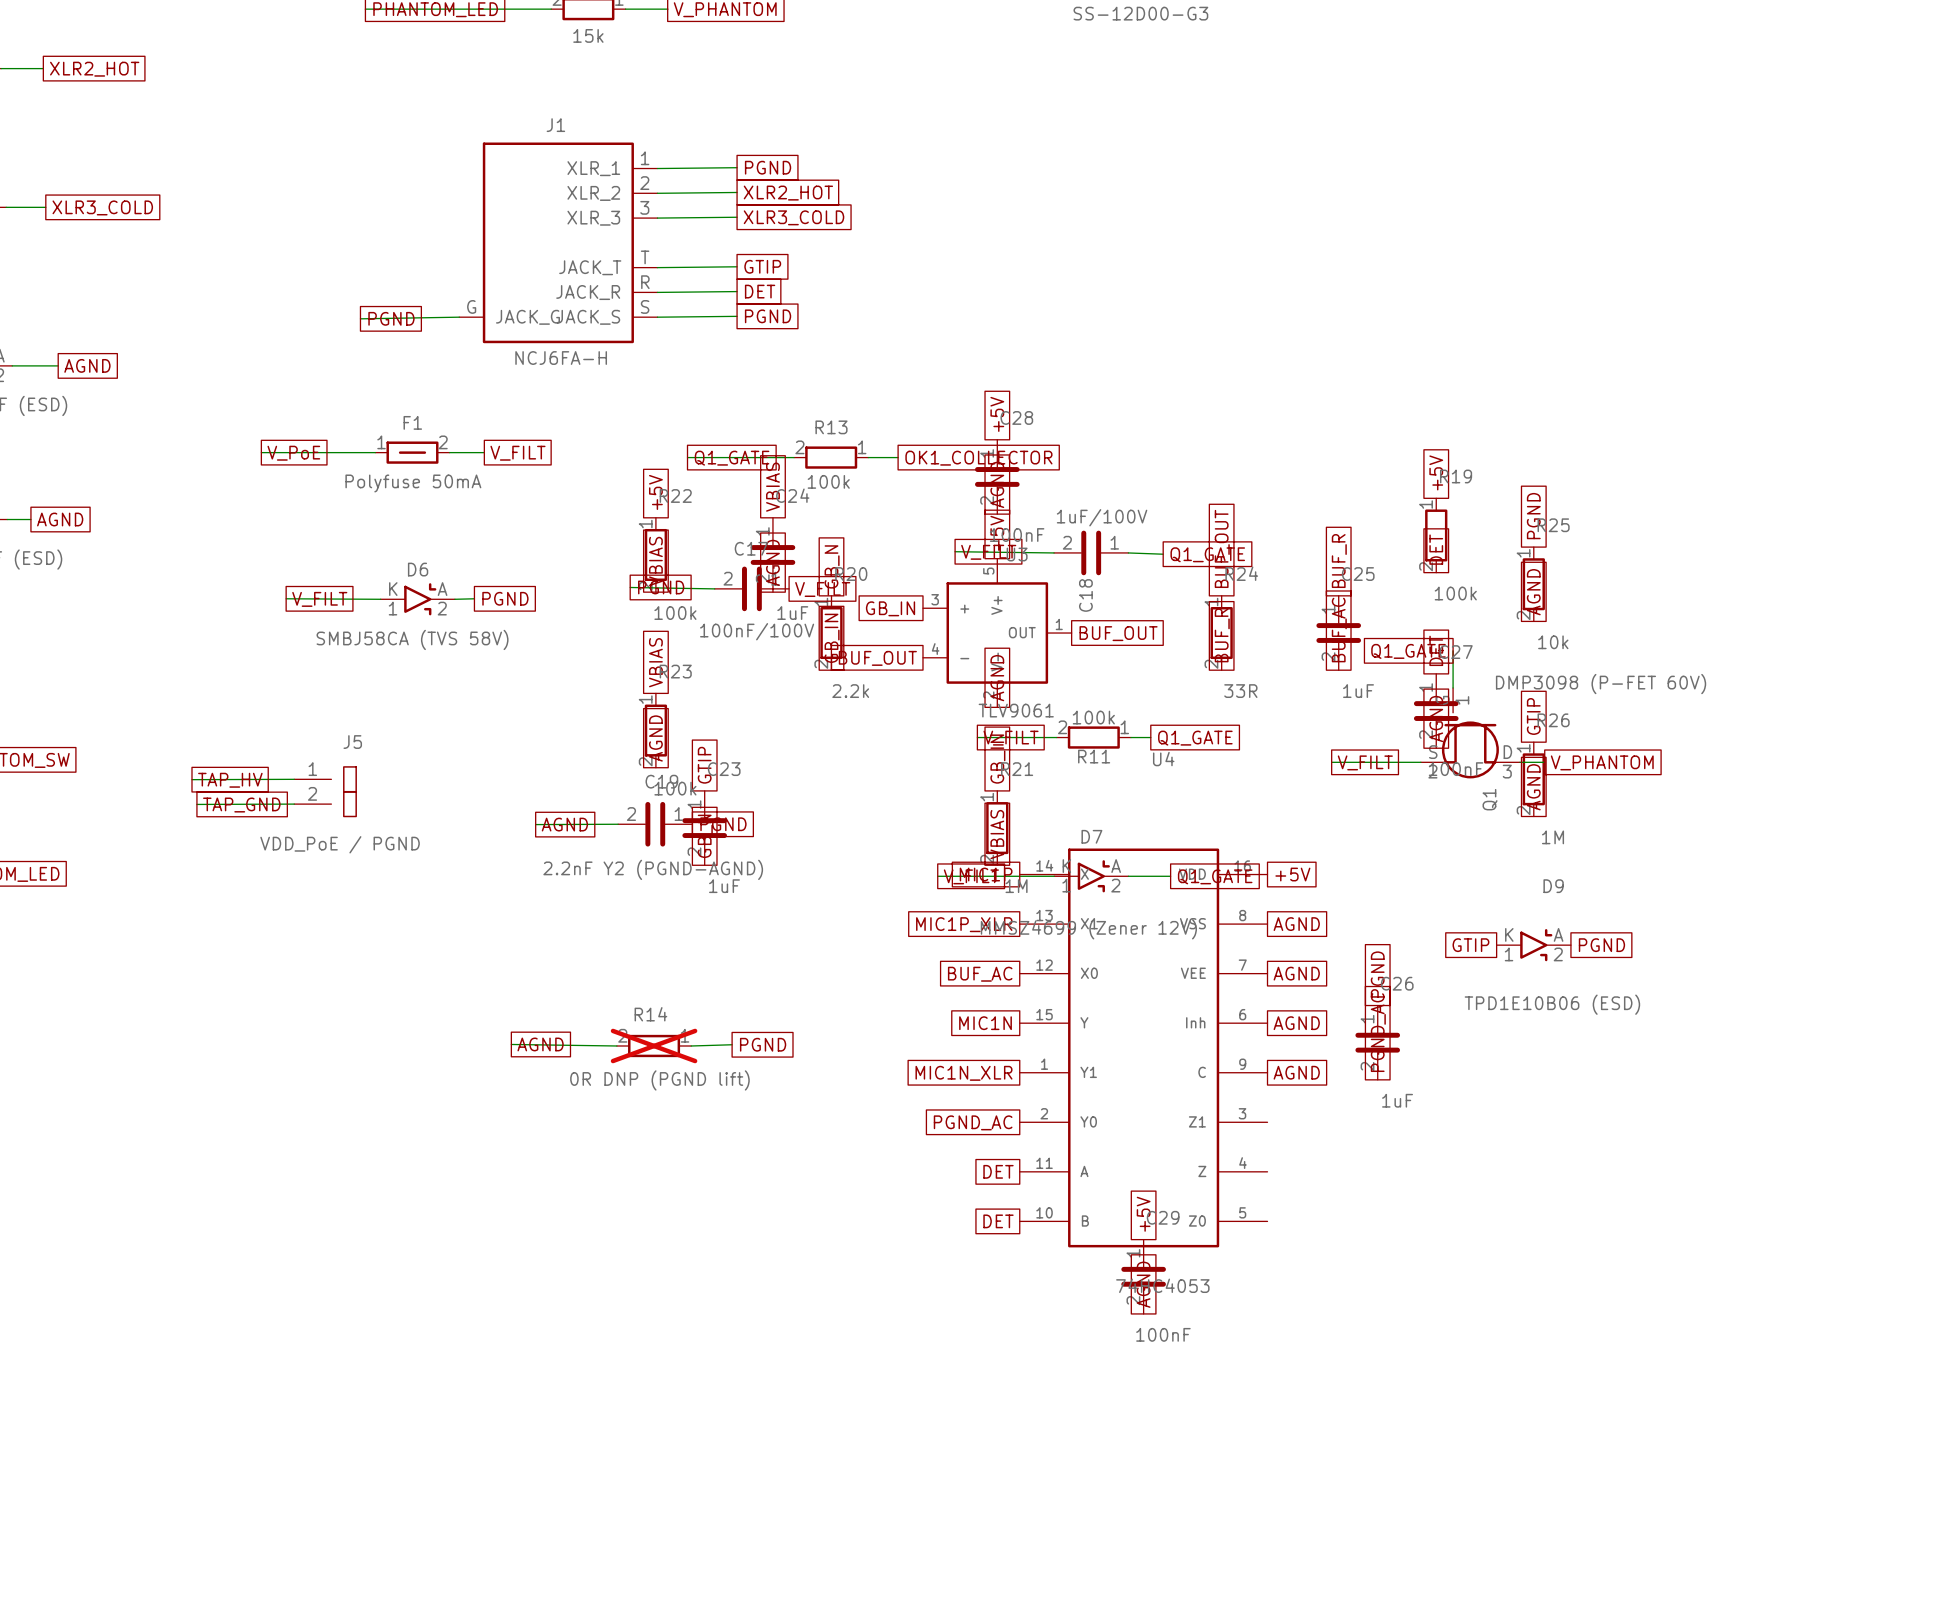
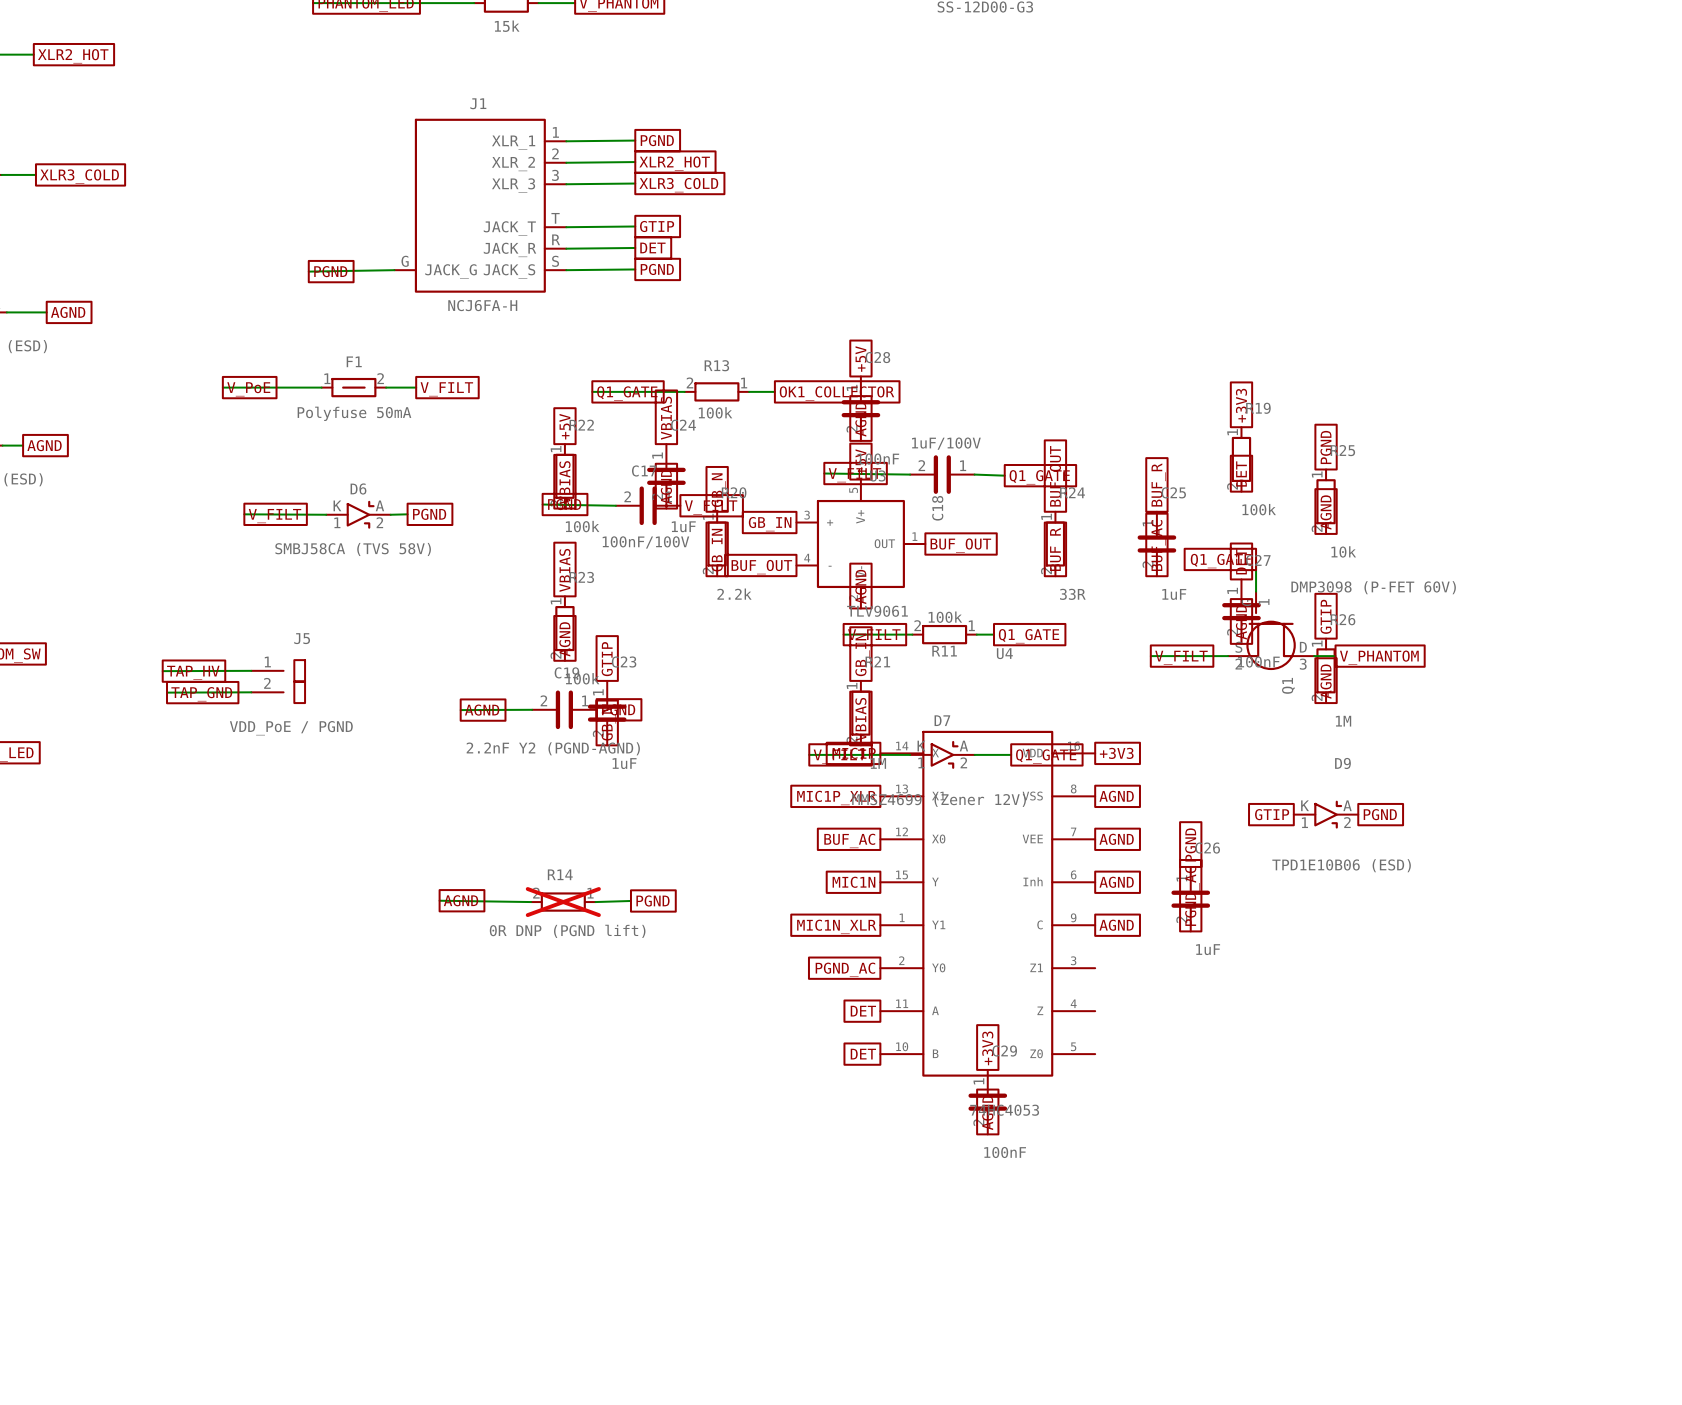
global label: +5V (1436, 472) -> +3V3 (1241, 405)
global label: +5V (1292, 874) -> +3V3 (1116, 753)
global label: +5V (1143, 1214) -> +3V3 (987, 1048)

